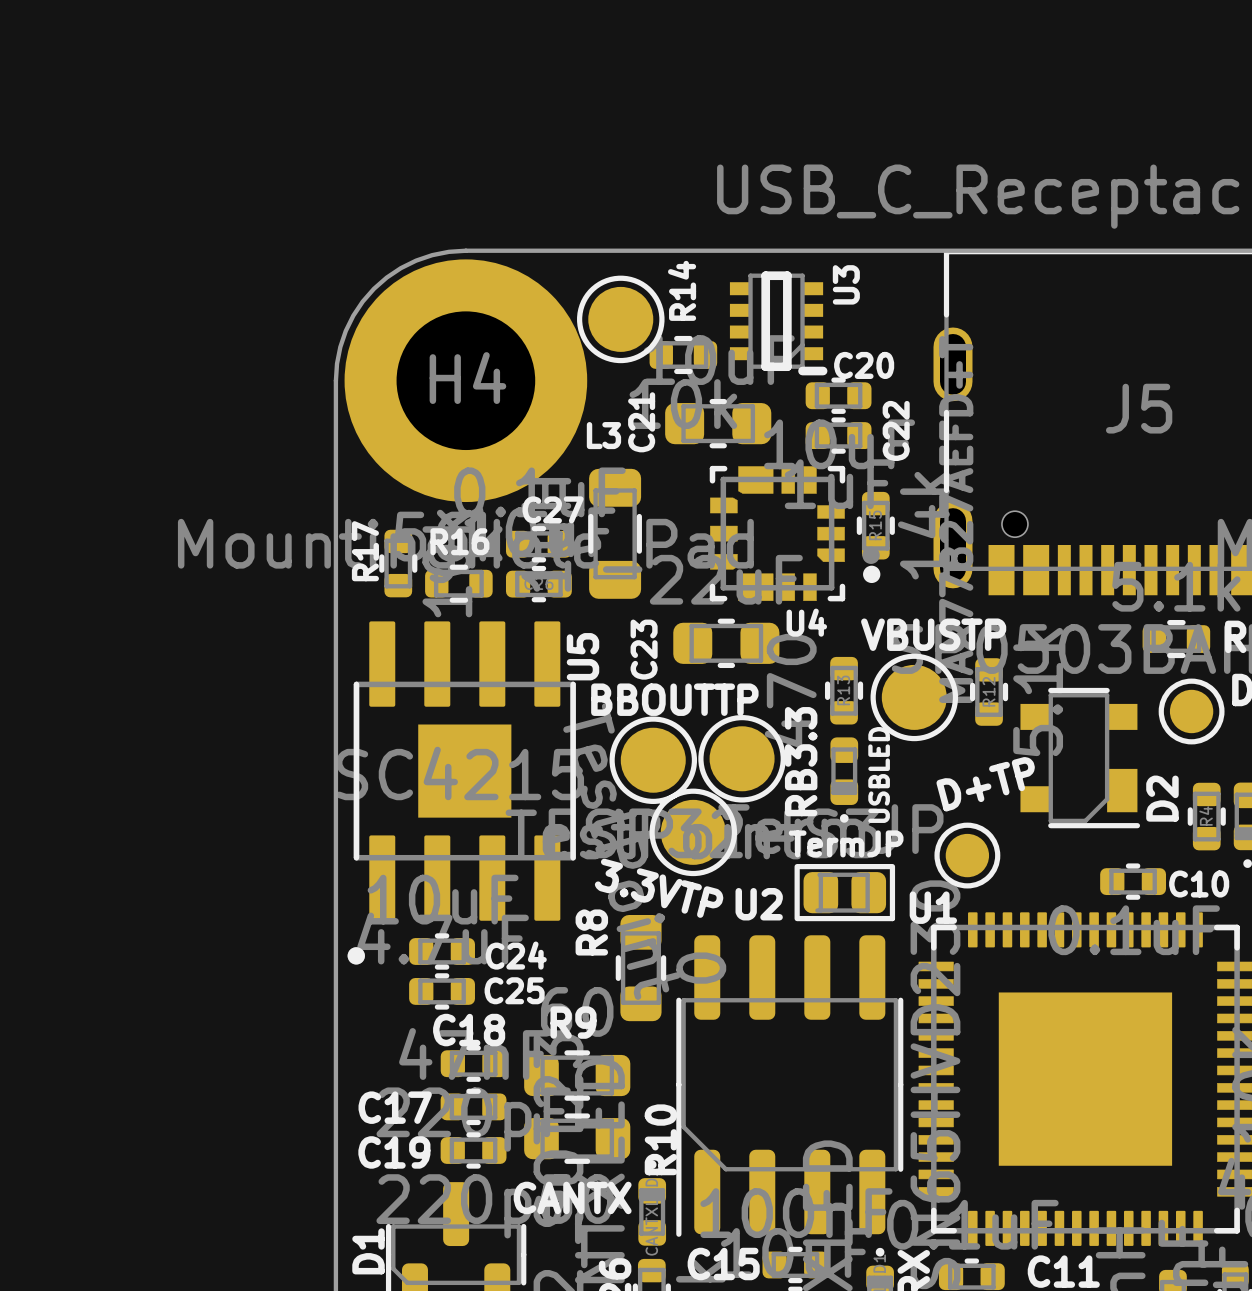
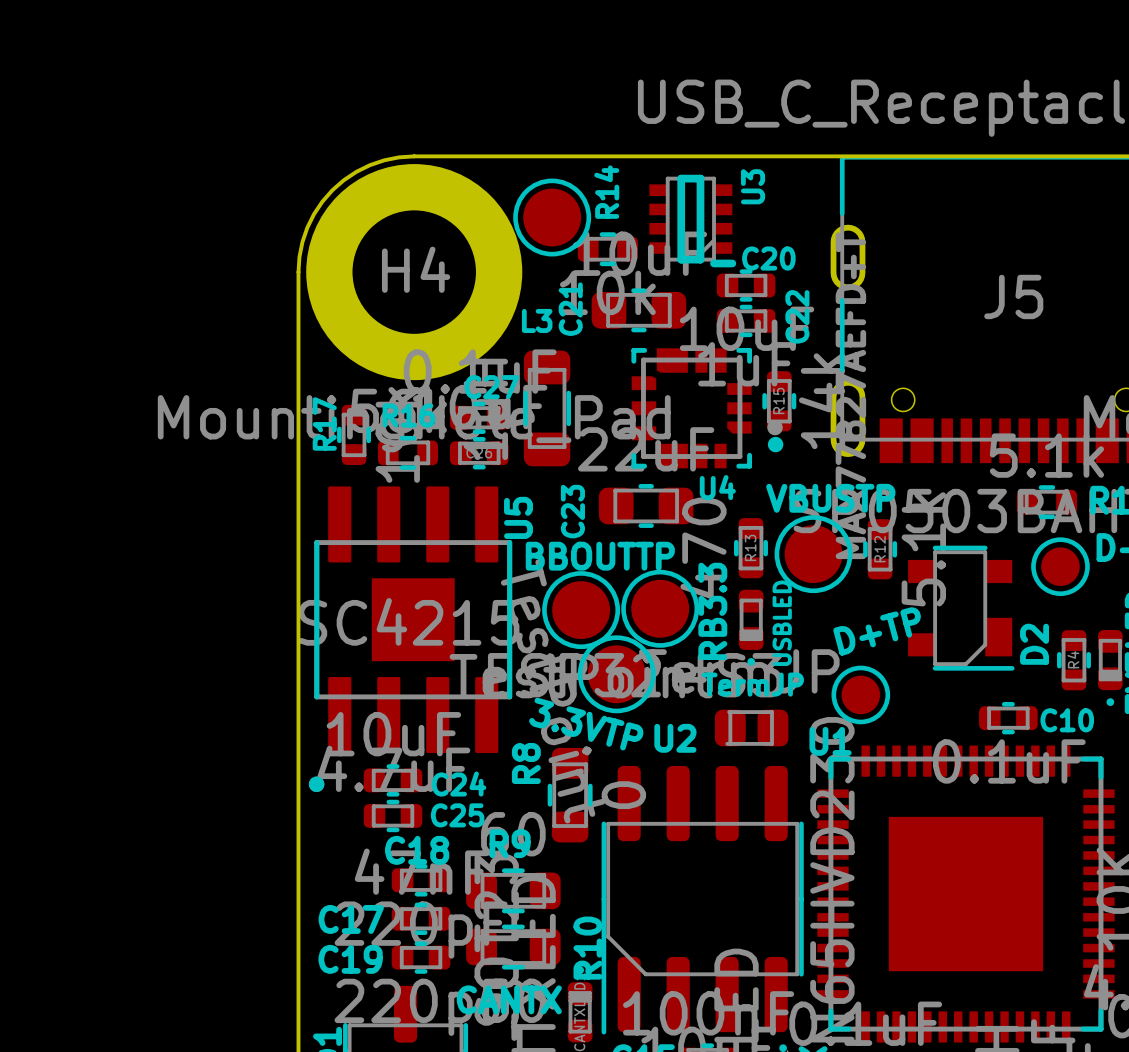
part footprint: [794, 863, 896, 922] -> [714, 709, 789, 747]

